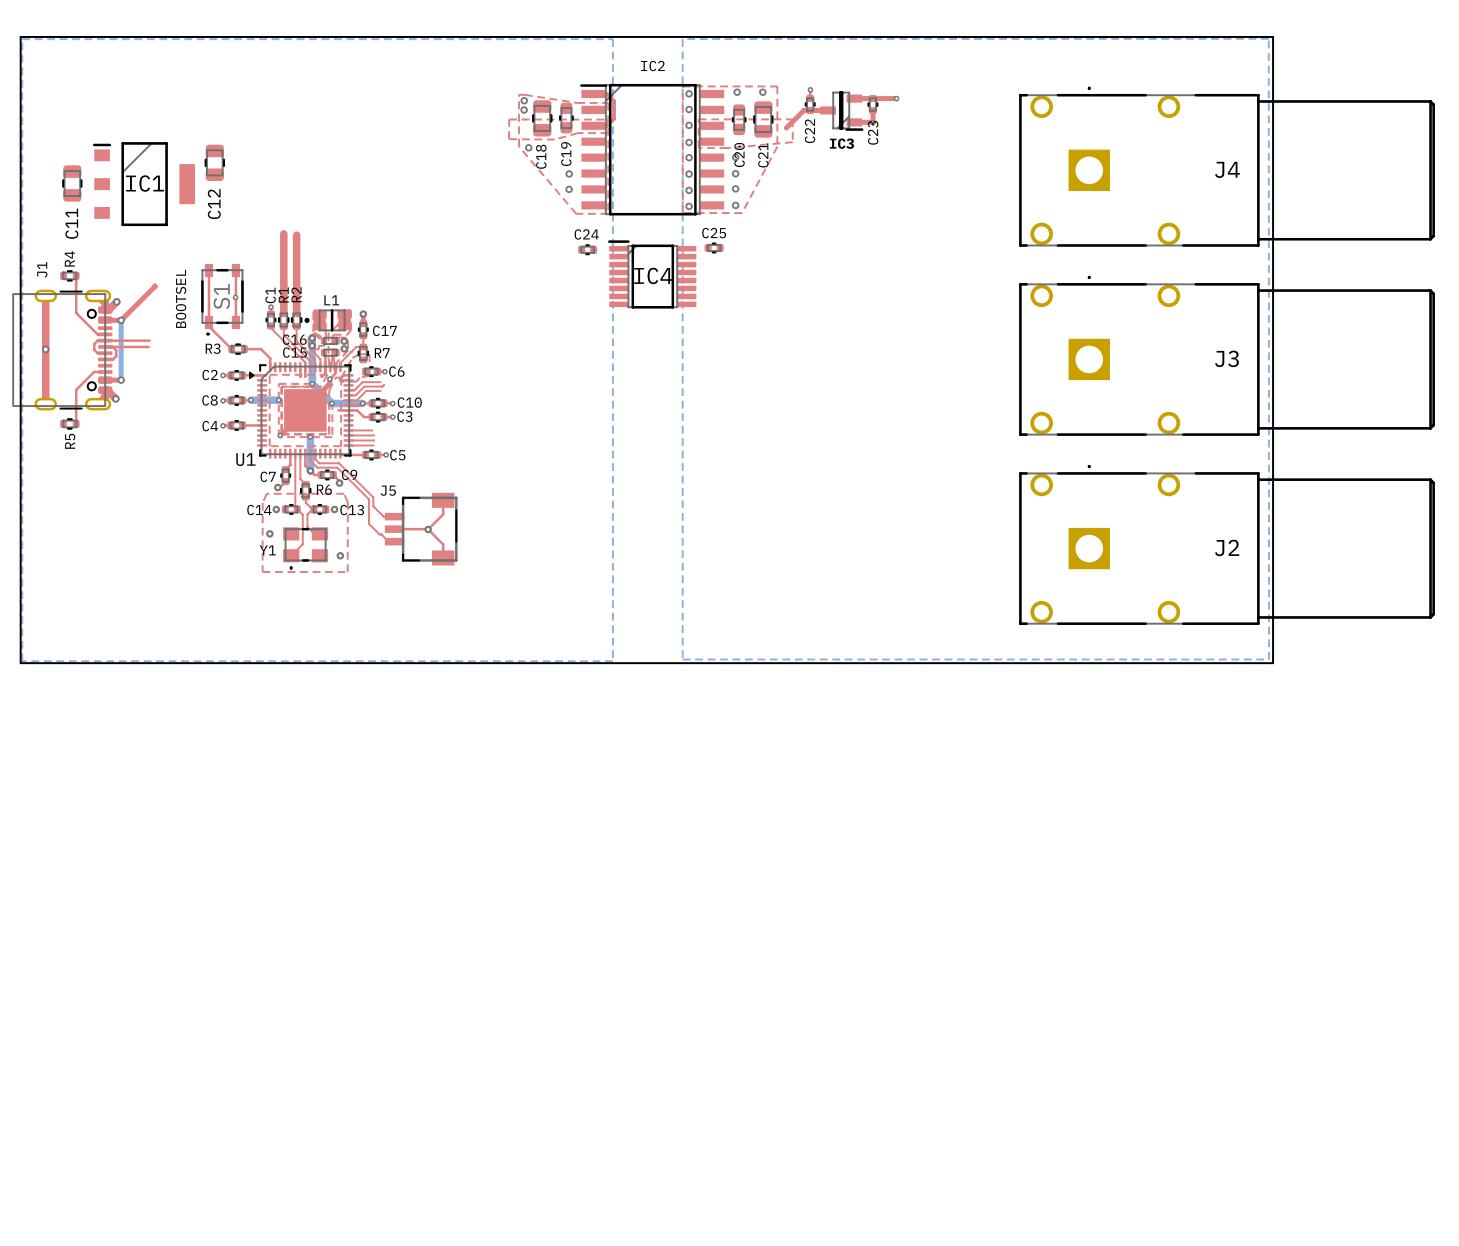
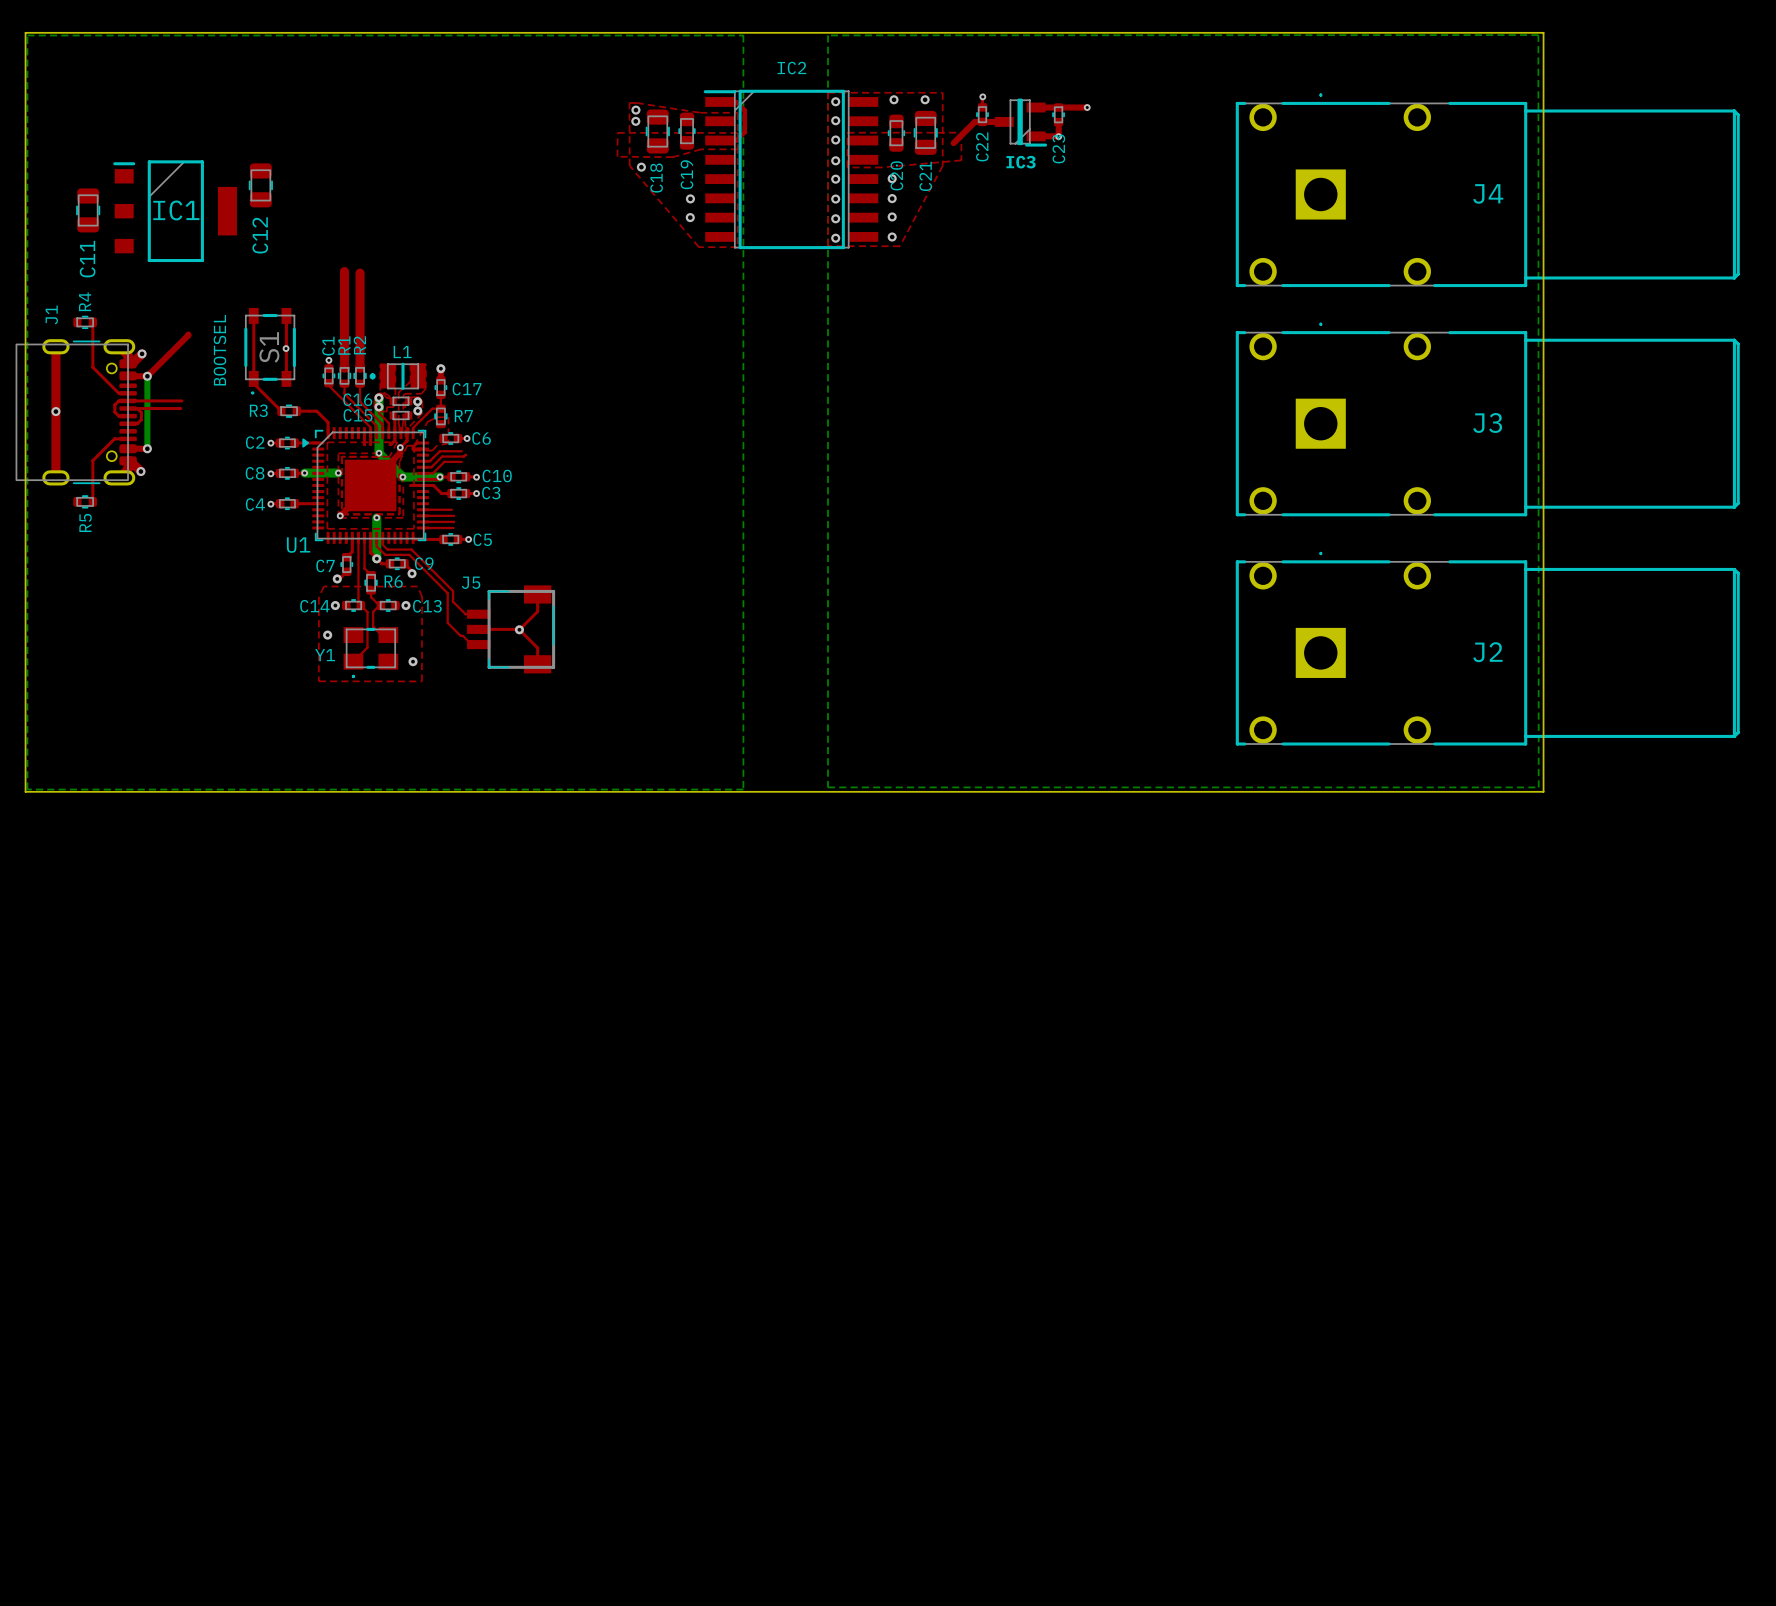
C25: (714, 247) -> none
C24: (587, 249) -> none
IC4: (652, 274) -> none

